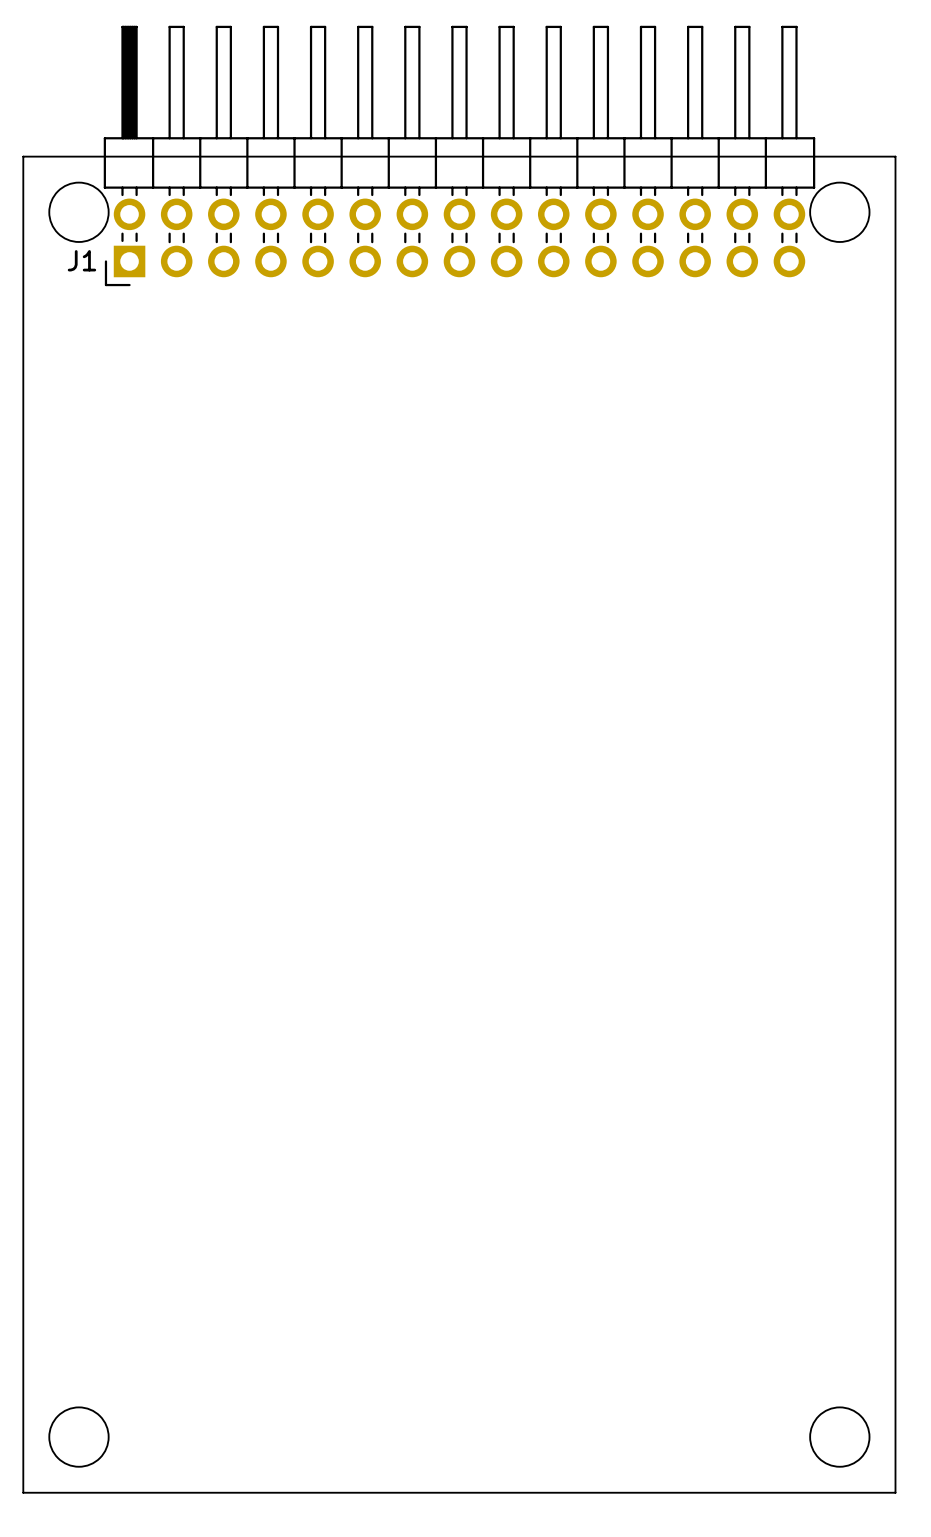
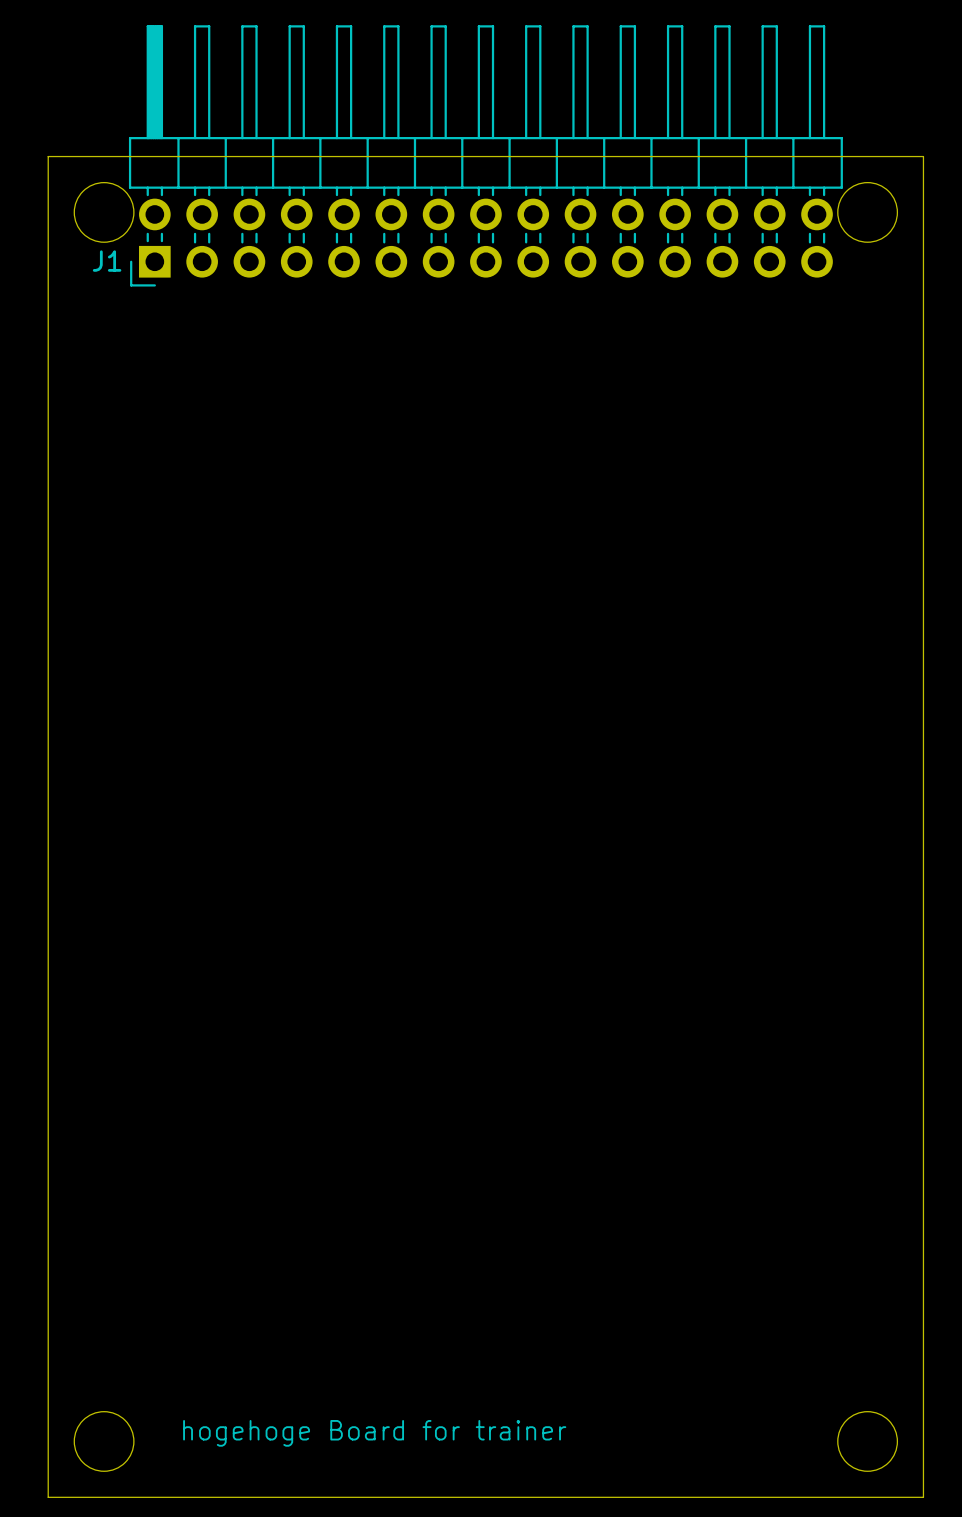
text: none -> hogehoge Board for trainer (374, 1433)

